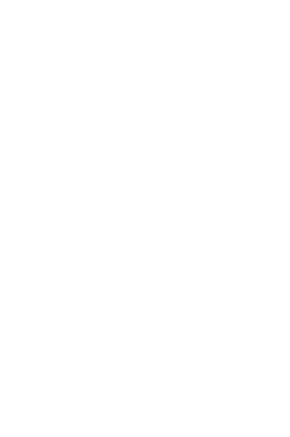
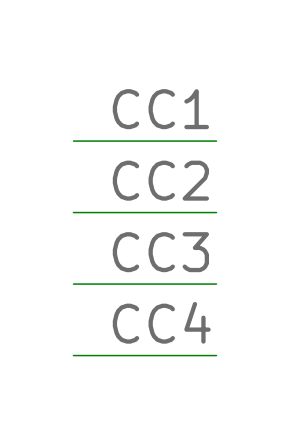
label: none -> CC1 (160, 109)
wire: none -> (73, 141) (216, 141)
label: none -> CC2 (160, 180)
wire: none -> (73, 212) (216, 212)
label: none -> CC3 (160, 252)
wire: none -> (73, 284) (216, 284)
label: none -> CC4 (161, 322)
wire: none -> (73, 355) (216, 355)

